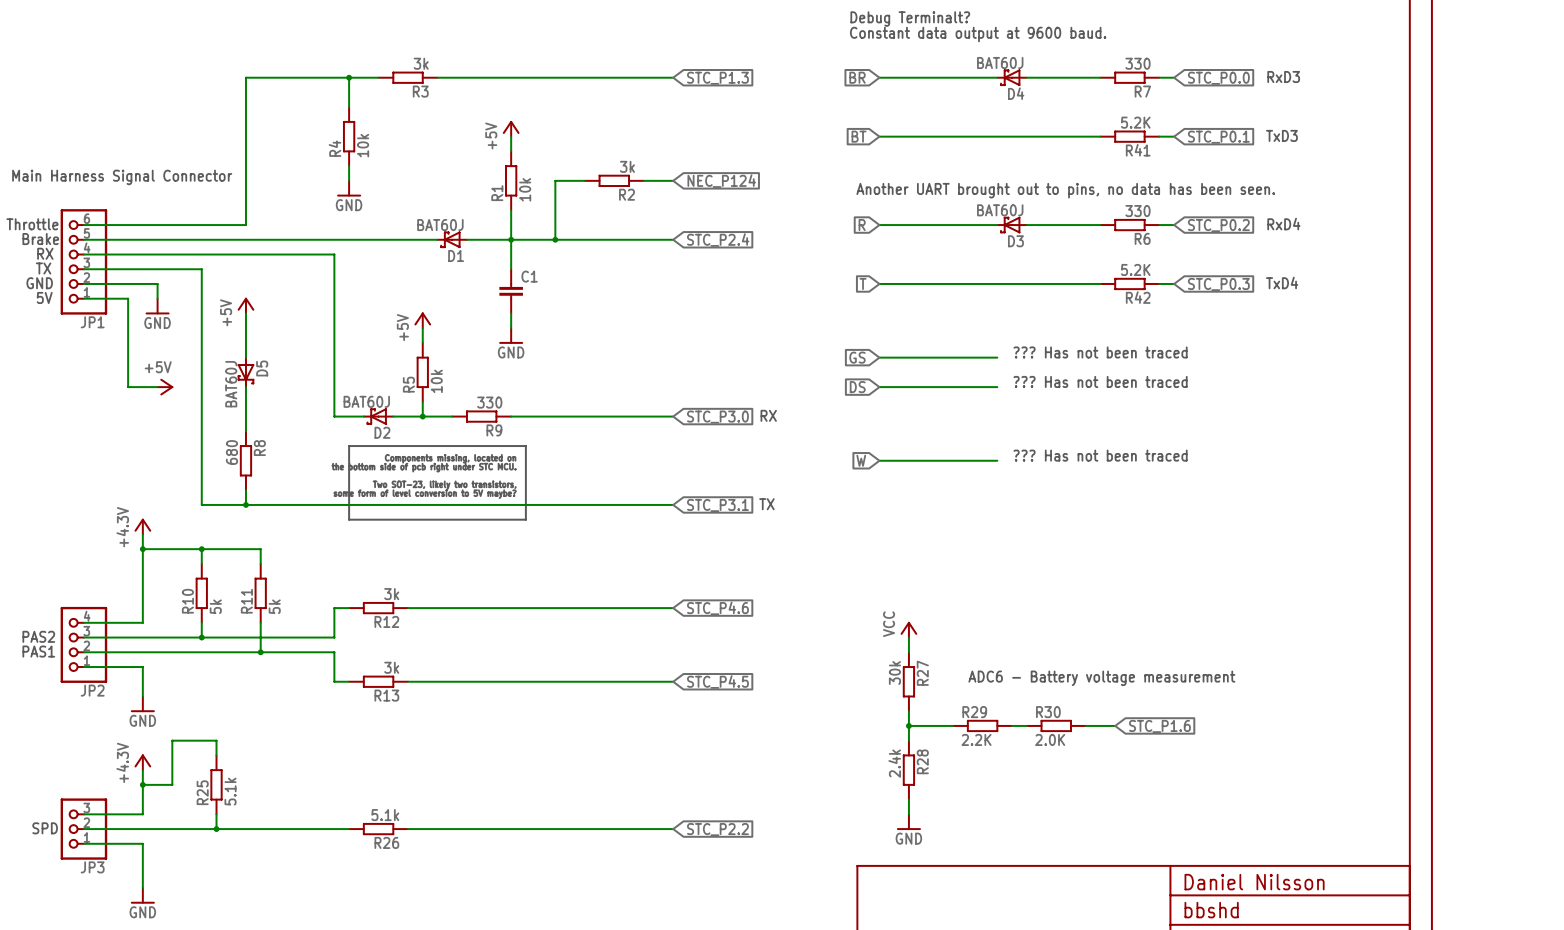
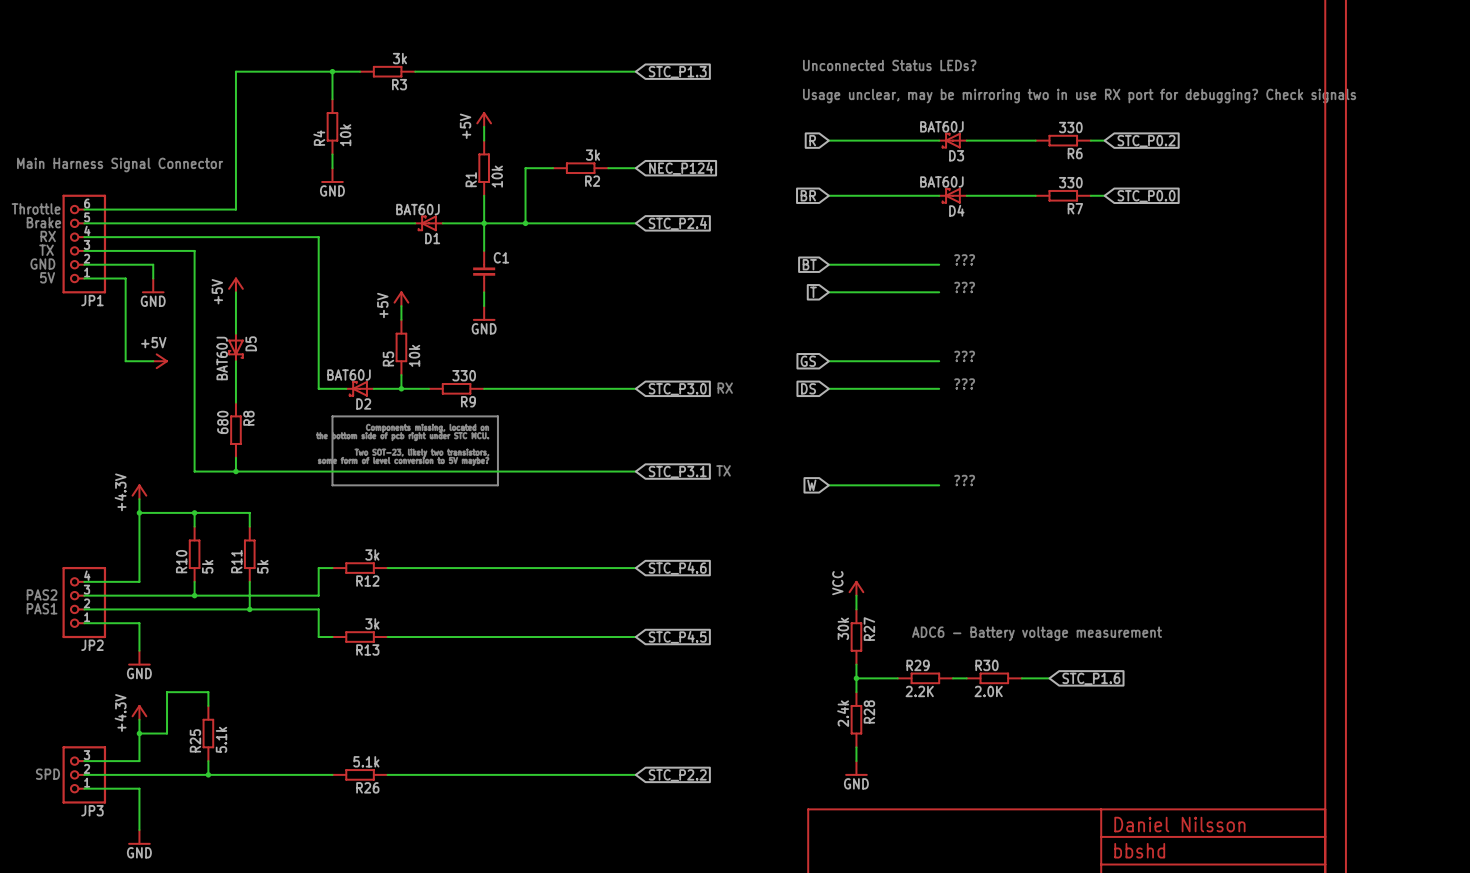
text: Debug Terminalt? (910, 19) -> none
text: Constant data output at 9600 baud. (978, 34) -> none
text: none -> Unconnected Status LEDs? (889, 65)
text: RxD3 (1283, 76) -> none
global label position: BR (857, 77) -> BR (808, 195)
wire: (879, 77) (997, 77) -> (828, 195) (939, 195)
D4 position: (1012, 77) -> (952, 195)
wire: (1026, 77) (1100, 77) -> (966, 195) (1035, 195)
R7 position: (1129, 77) -> (1063, 195)
wire: (1159, 77) (1174, 77) -> none
global label position: STC_P0.0 (1218, 78) -> STC_P0.0 (1146, 196)
text: none -> Usage unclear, may be mirroring two in use RX port for debugging? Check signals (1079, 96)
text: TxD3 (1281, 135) -> none
global label: BT (859, 136) -> none
wire: (879, 136) (1100, 136) -> none
R41: 5.2K (1129, 136) -> none
wire: (1159, 136) (1174, 136) -> none
global label: STC_P0.1 (1218, 137) -> none
text: Another UART brought out to pins, no data has been seen. (1065, 190) -> none
text: RxD4 (1283, 224) -> none
global label position: R (862, 225) -> R (812, 140)
wire: (879, 225) (997, 225) -> (828, 140) (939, 140)
D3 position: (1012, 225) -> (952, 140)
wire: (1026, 225) (1100, 225) -> (966, 140) (1035, 140)
R6 position: (1129, 225) -> (1063, 140)
wire: (1159, 225) (1174, 225) -> (1090, 140) (1104, 140)
global label position: STC_P0.2 (1218, 225) -> STC_P0.2 (1146, 141)
text: none -> ??? (964, 259)
text: TxD4 (1282, 282) -> none
global label: T (863, 283) -> BT (809, 264)
wire: (997, 283) (1100, 283) -> none
R42: 5.2K (1129, 283) -> none
wire: (1159, 283) (1174, 283) -> (1090, 195) (1104, 195)
global label: STC_P0.3 (1218, 284) -> none
text: none -> ??? (964, 287)
global label: none -> T (813, 292)
text: ??? Has not been traced (1100, 352) -> none
global label: GS (857, 357) -> none
wire: (879, 357) (997, 357) -> (828, 292) (939, 292)
text: ??? Has not been traced (1100, 381) -> ??? (964, 356)
global label: DS (857, 387) -> GS (808, 361)
text: none -> ??? (964, 383)
global label: none -> DS (808, 388)
text: ??? Has not been traced (1100, 455) -> none
global label position: W (861, 460) -> W (811, 485)
wire: (879, 460) (997, 460) -> (828, 388) (939, 388)
text: none -> ??? (964, 480)
wire: none -> (828, 485) (939, 485)

